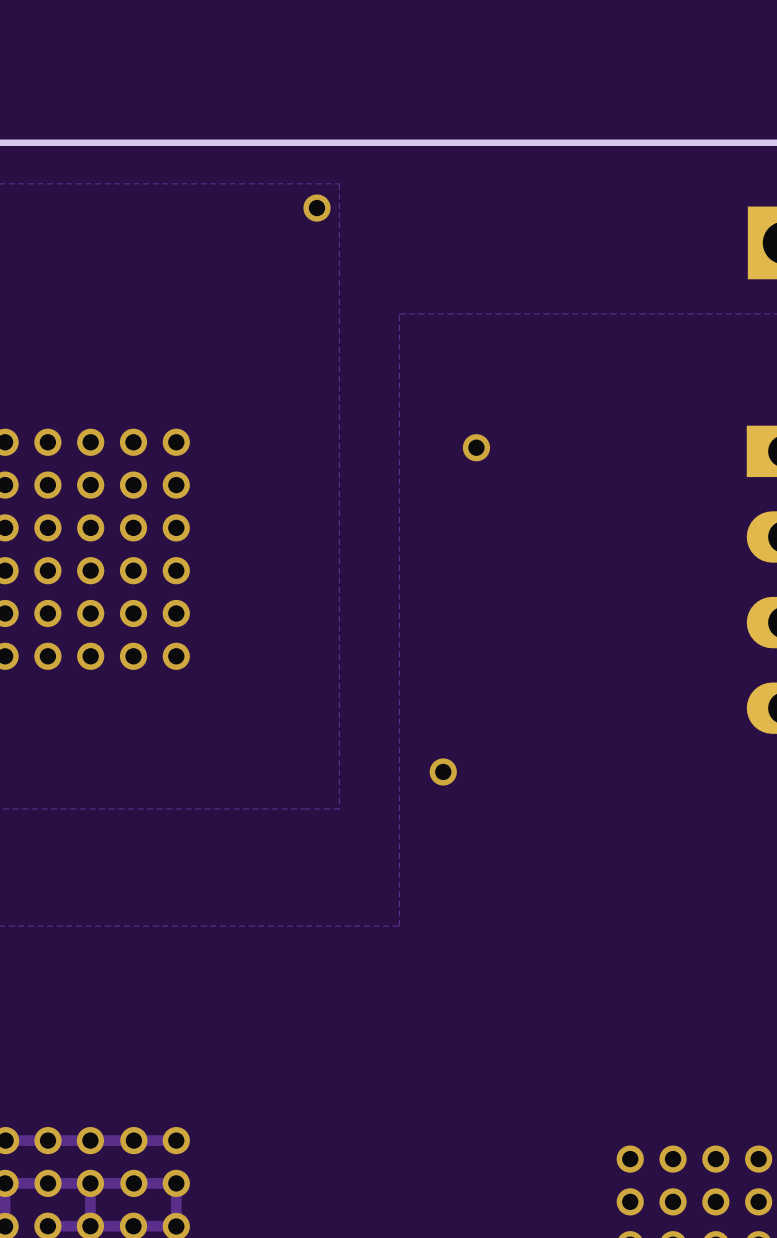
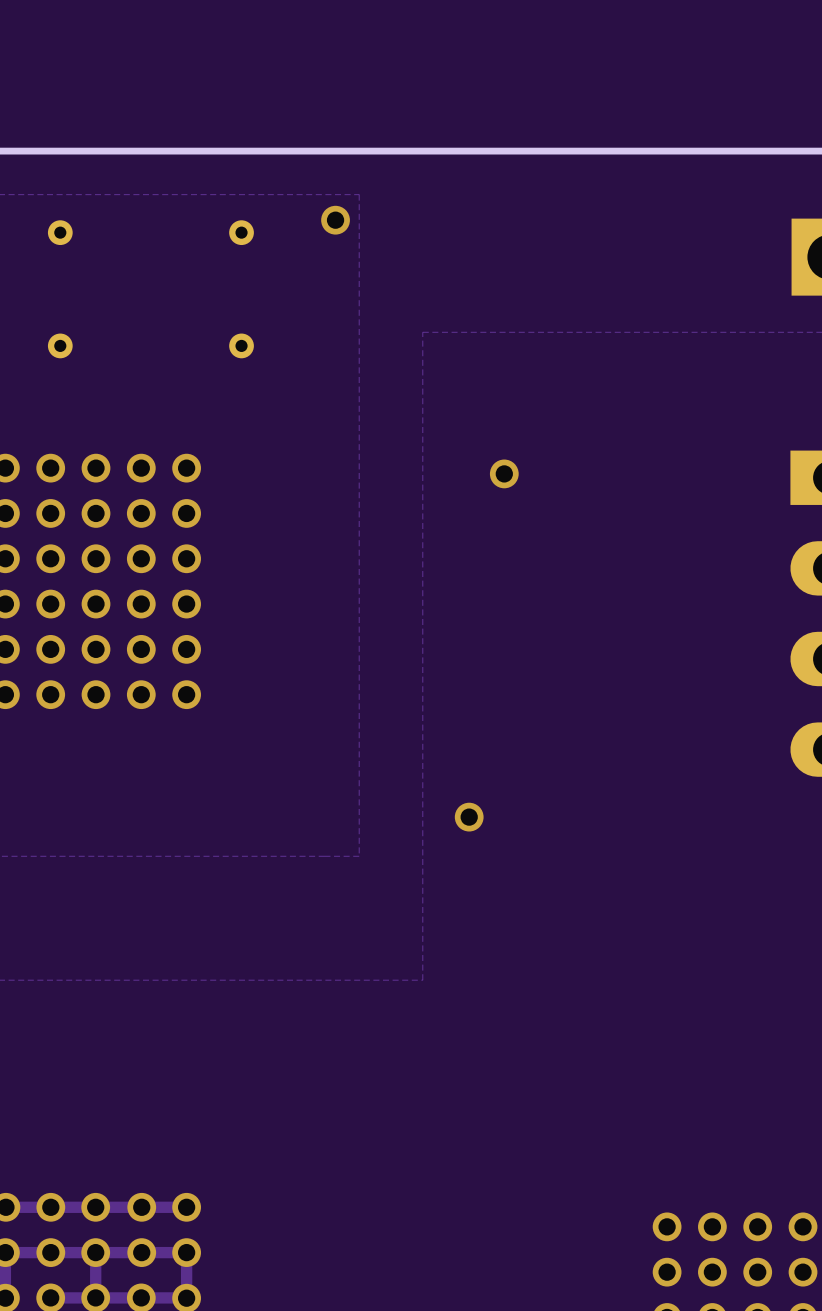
part: none -> (60, 232)
part: none -> (241, 232)
part: none -> (60, 345)
part: none -> (241, 345)

